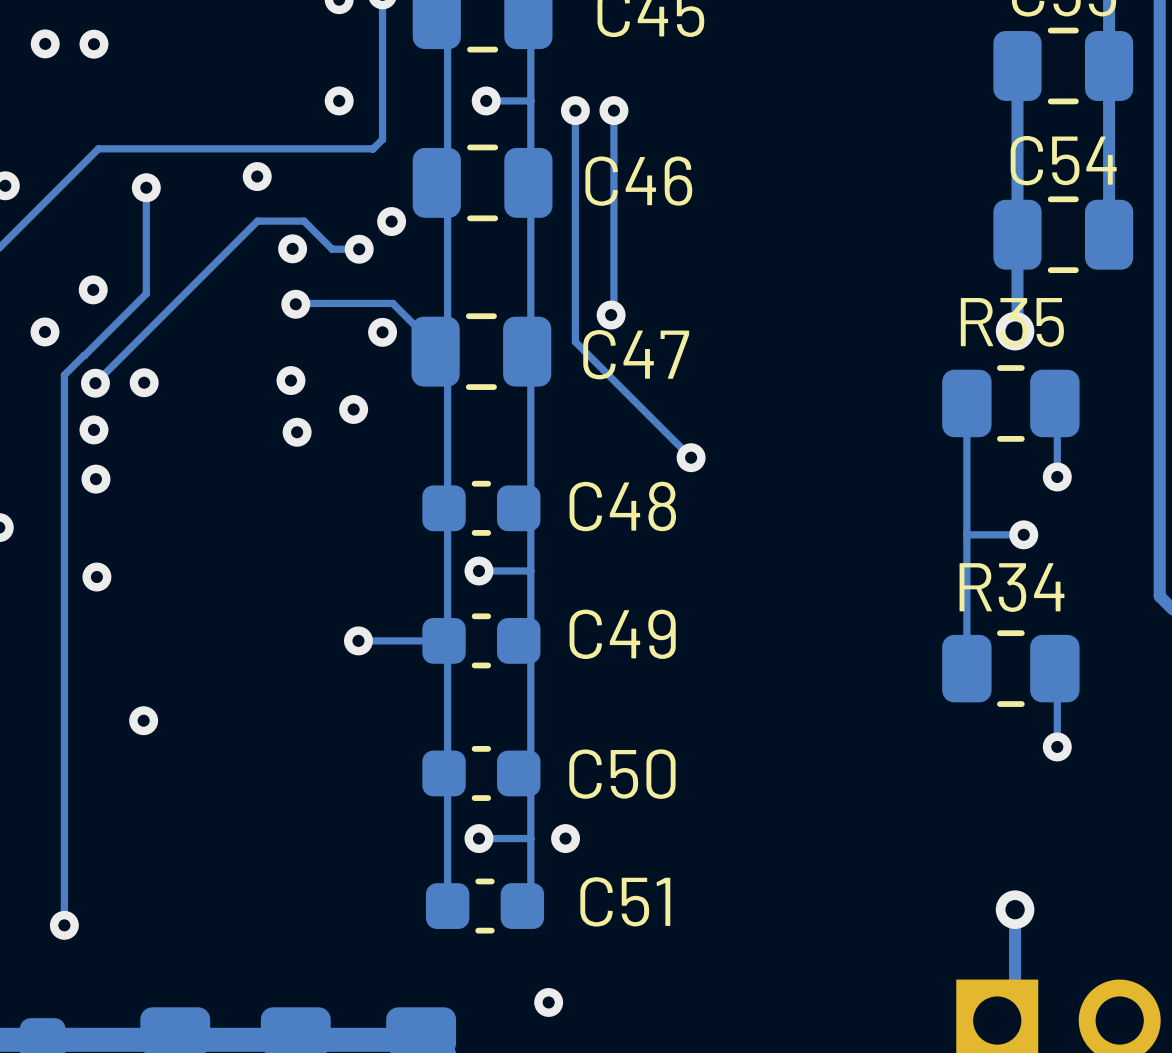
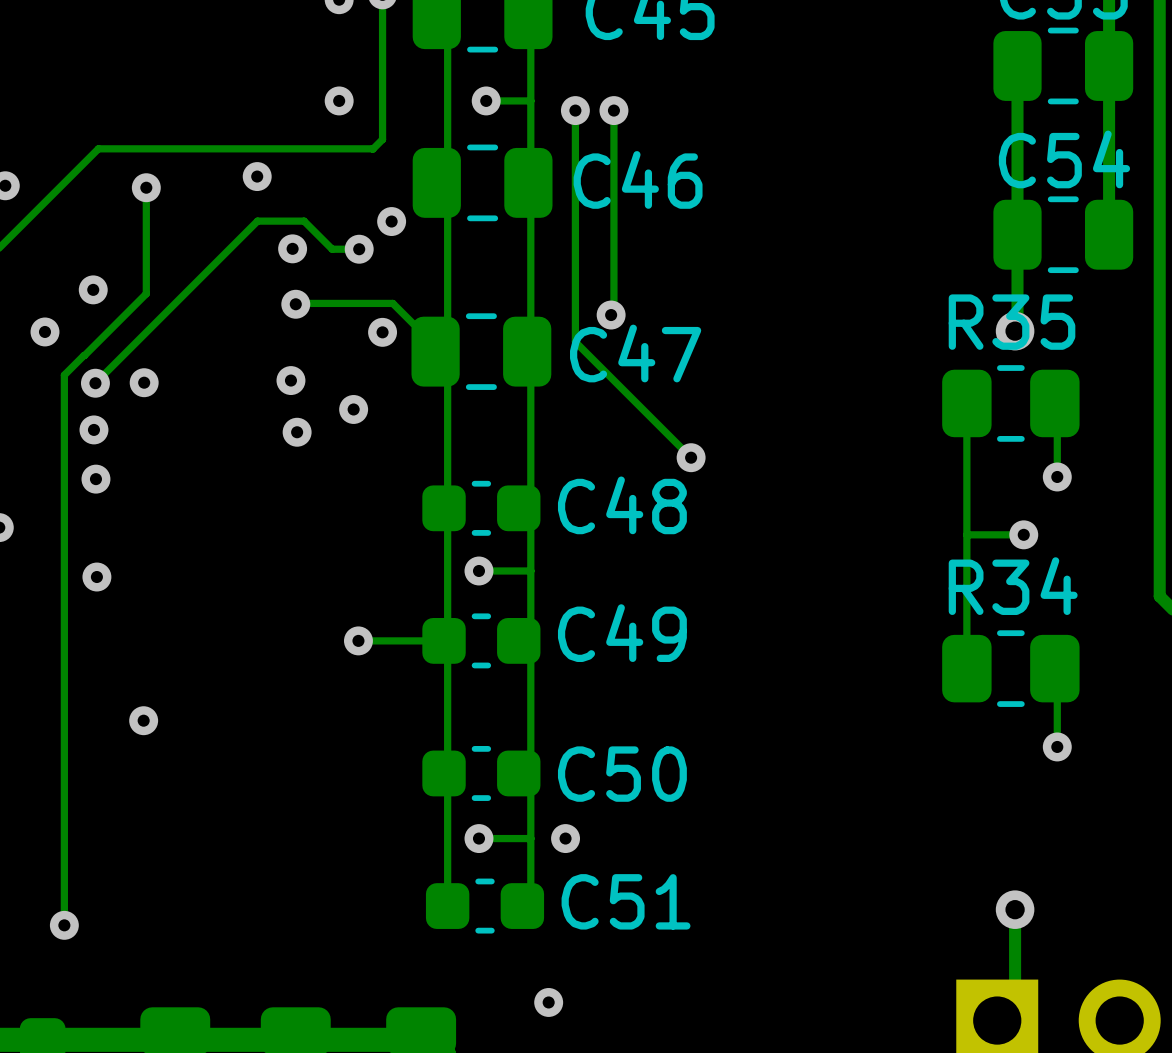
via: (45, 43) -> none
via: (93, 44) -> none

